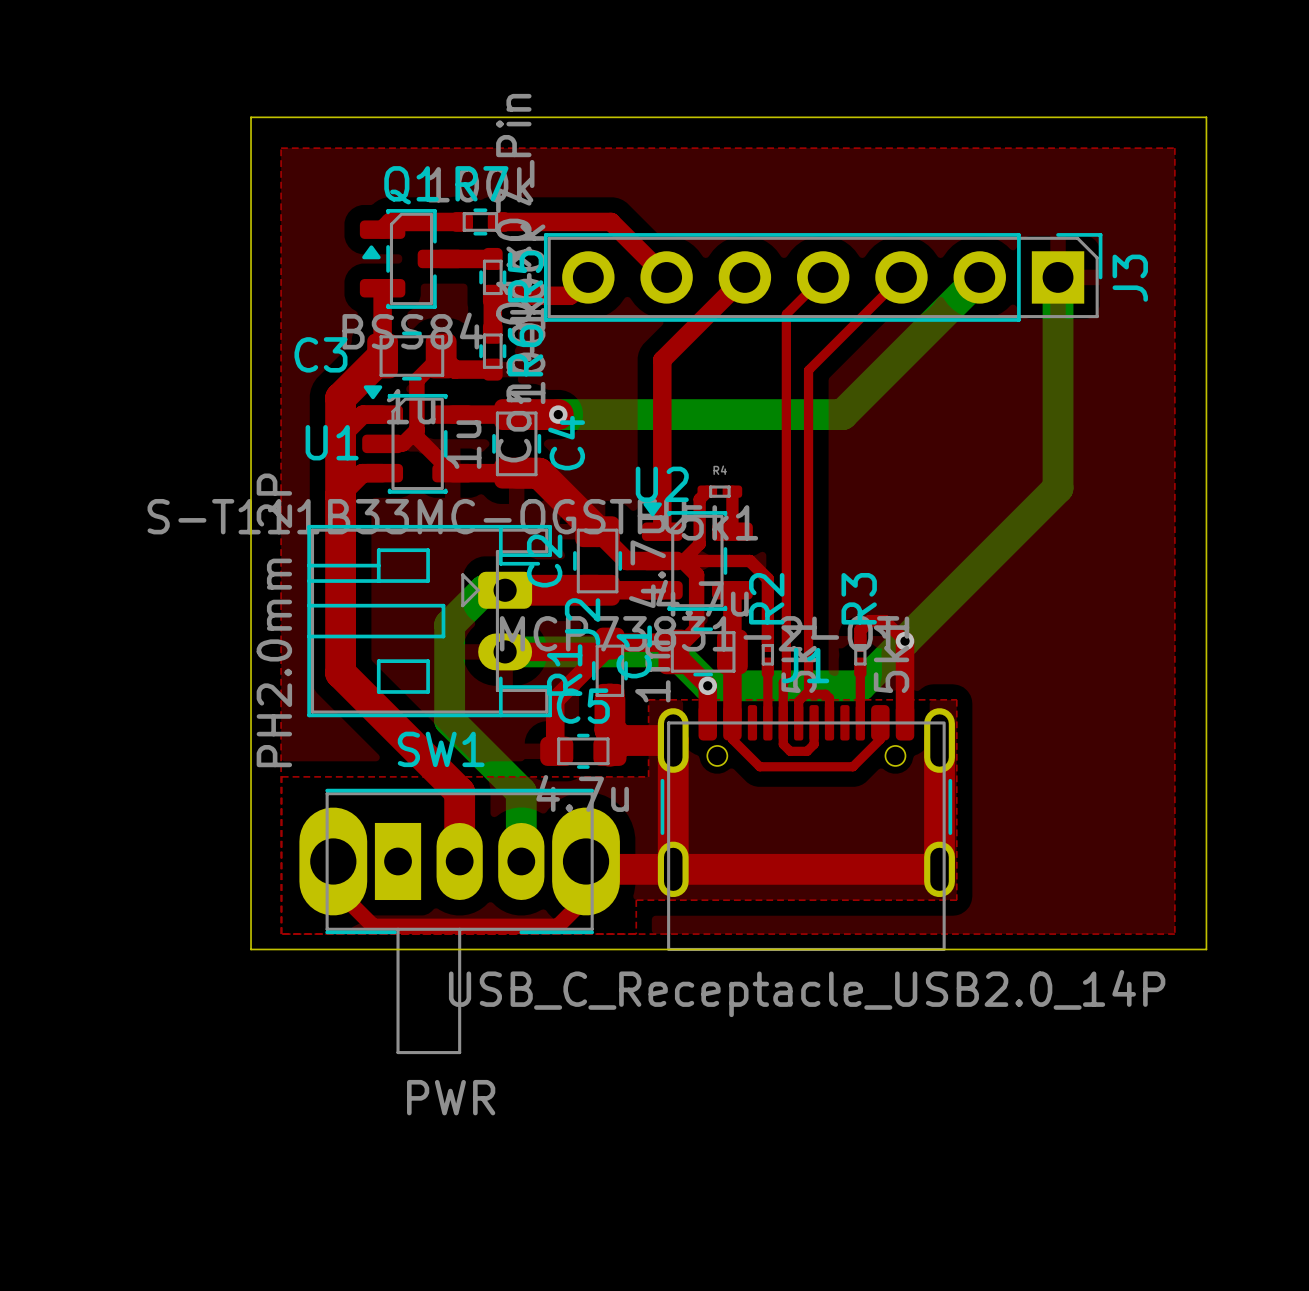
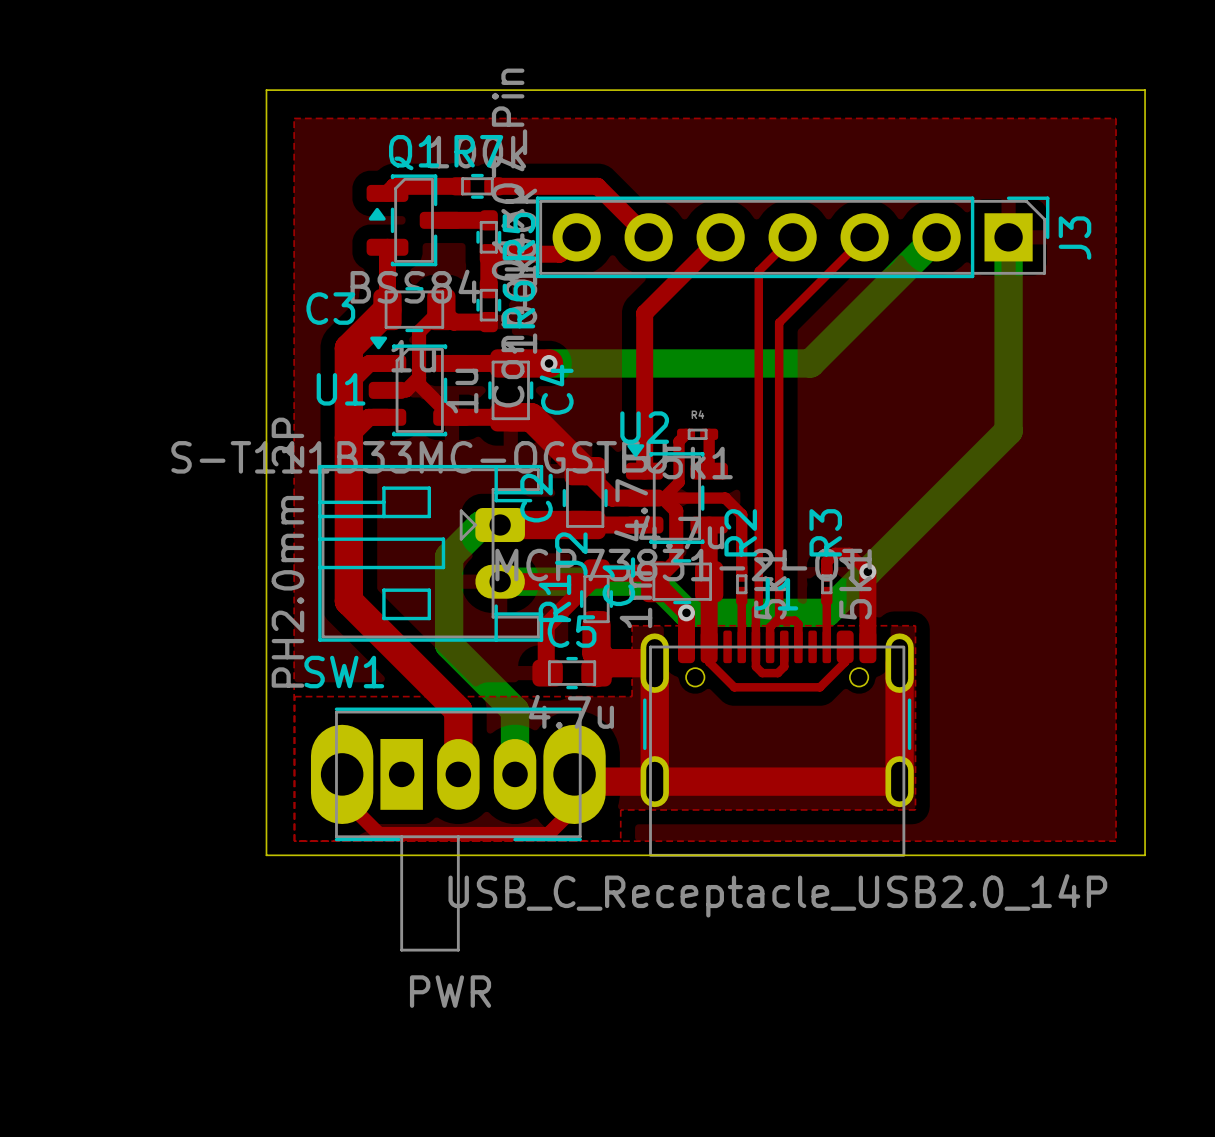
SW1 name position: SW1 (441, 749) -> SW1 (344, 672)

